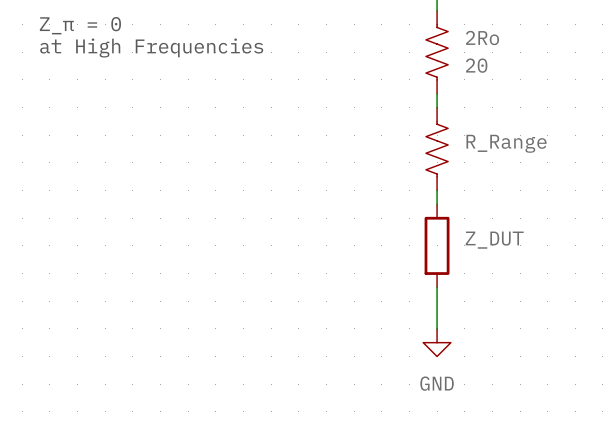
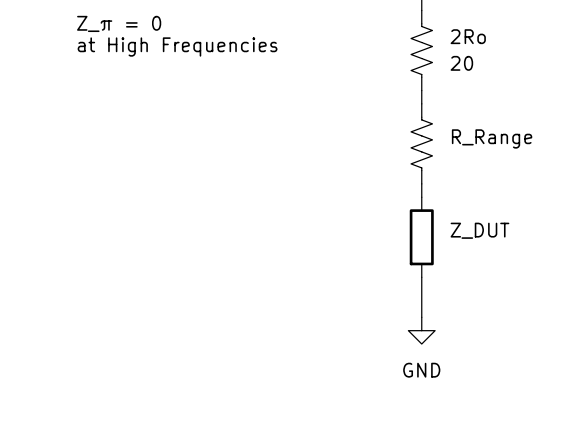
text position: Z_π = 0 (80, 25) -> Z_π = 0 (119, 23)
text position: at High Frequencies (151, 48) -> at High Frequencies (177, 47)

